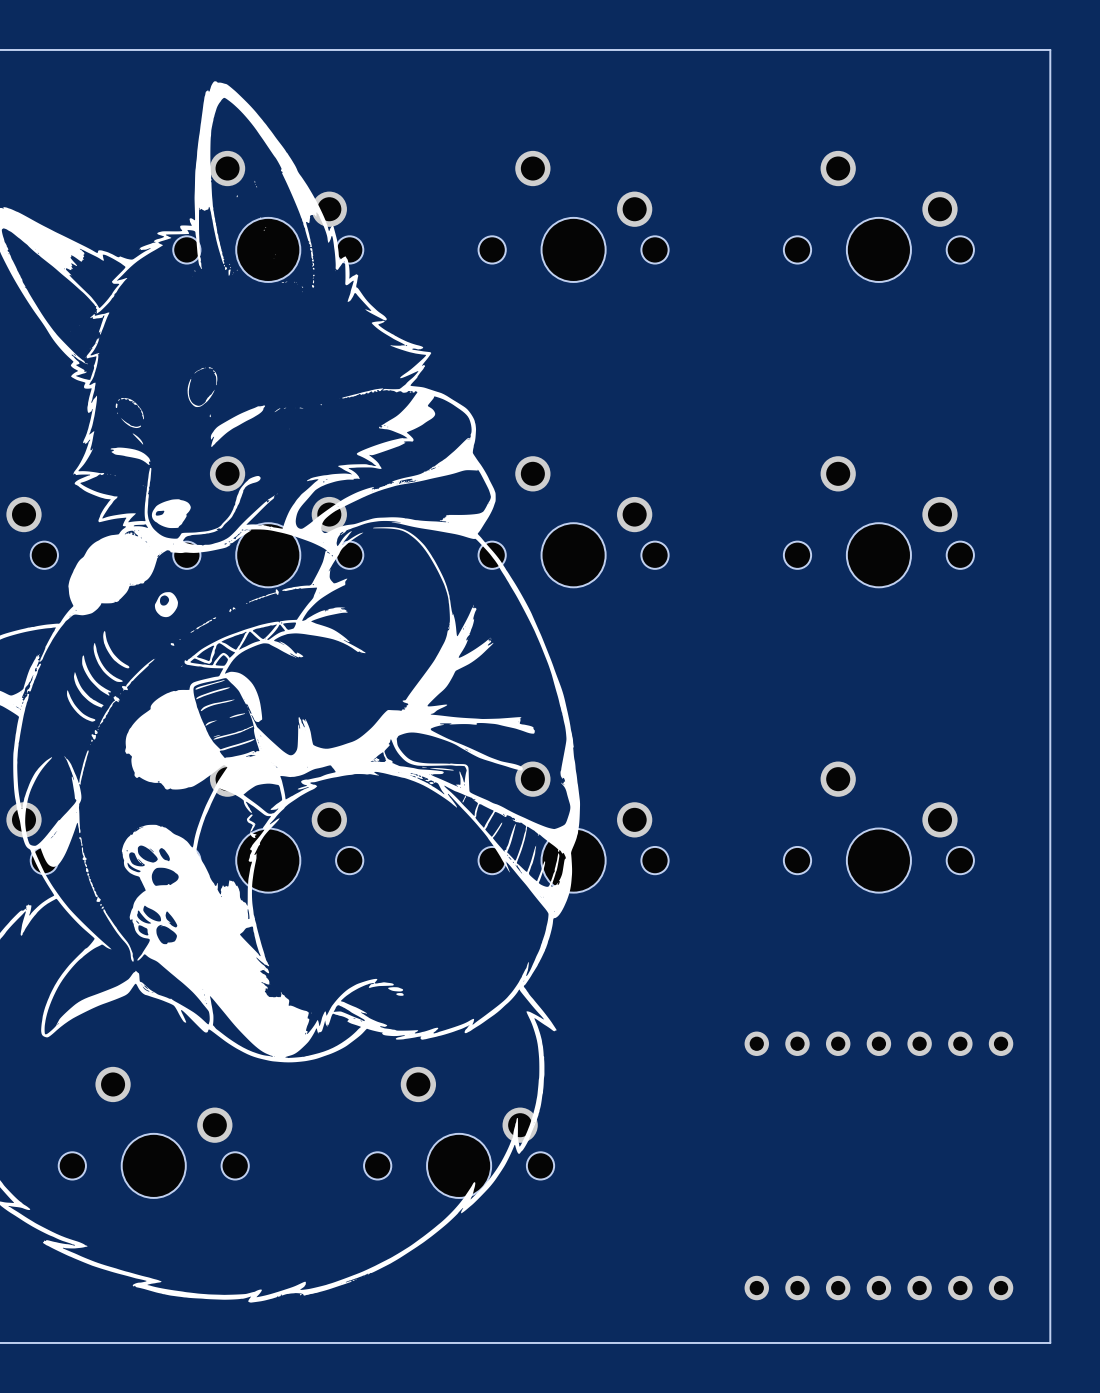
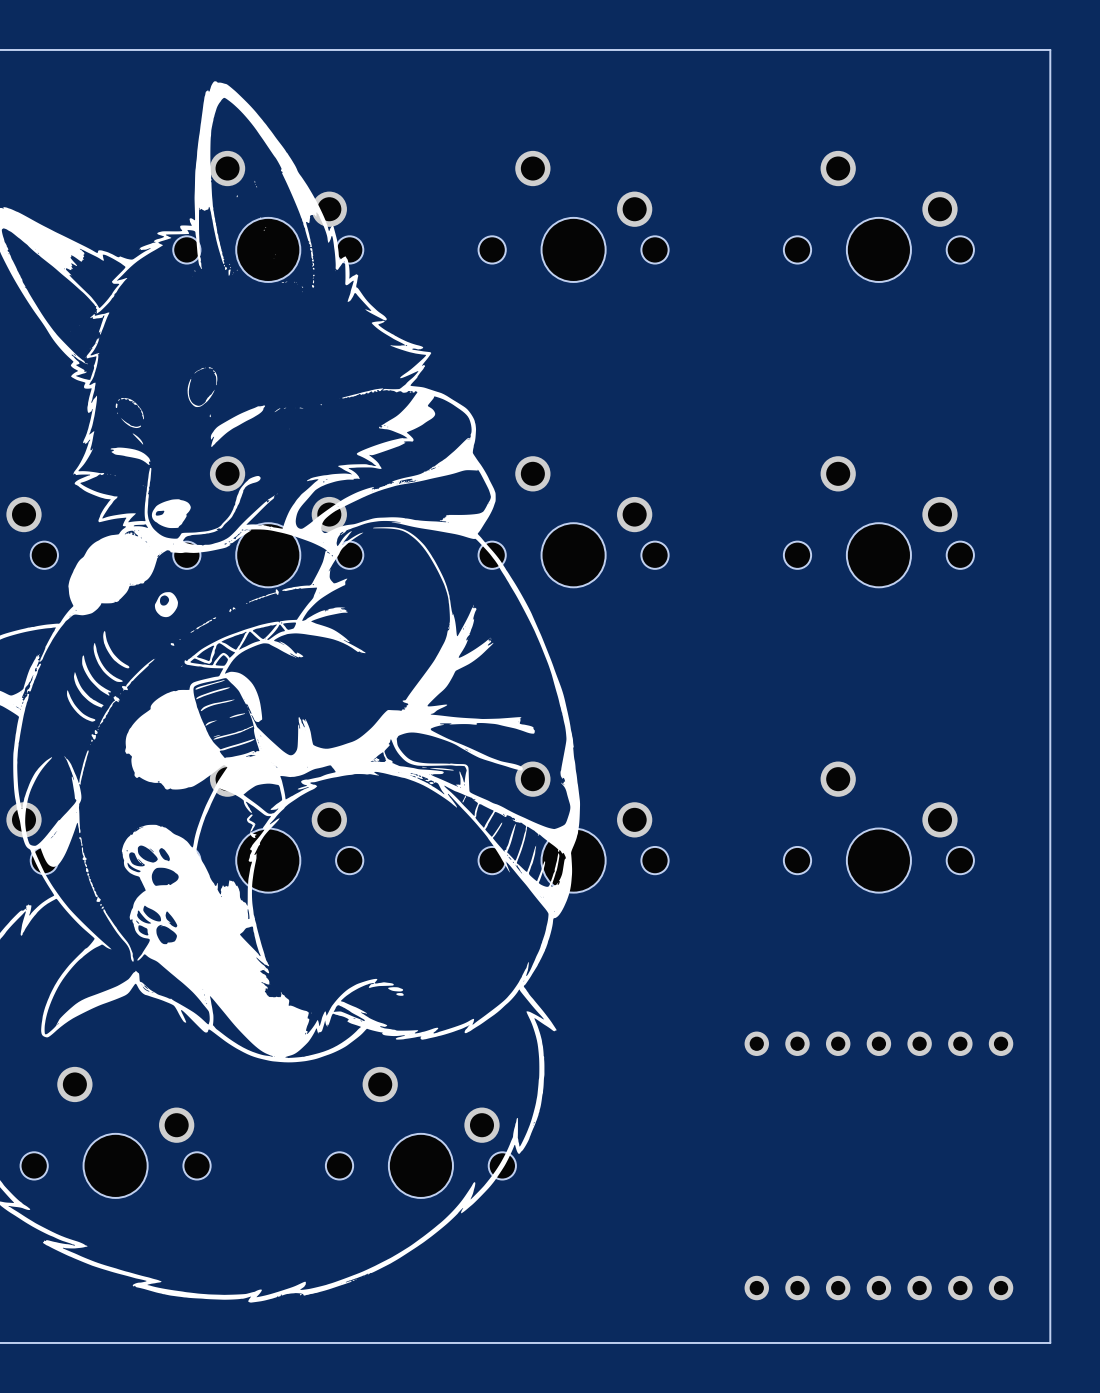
part position: (153, 1132) -> (115, 1132)
part position: (459, 1132) -> (420, 1132)

